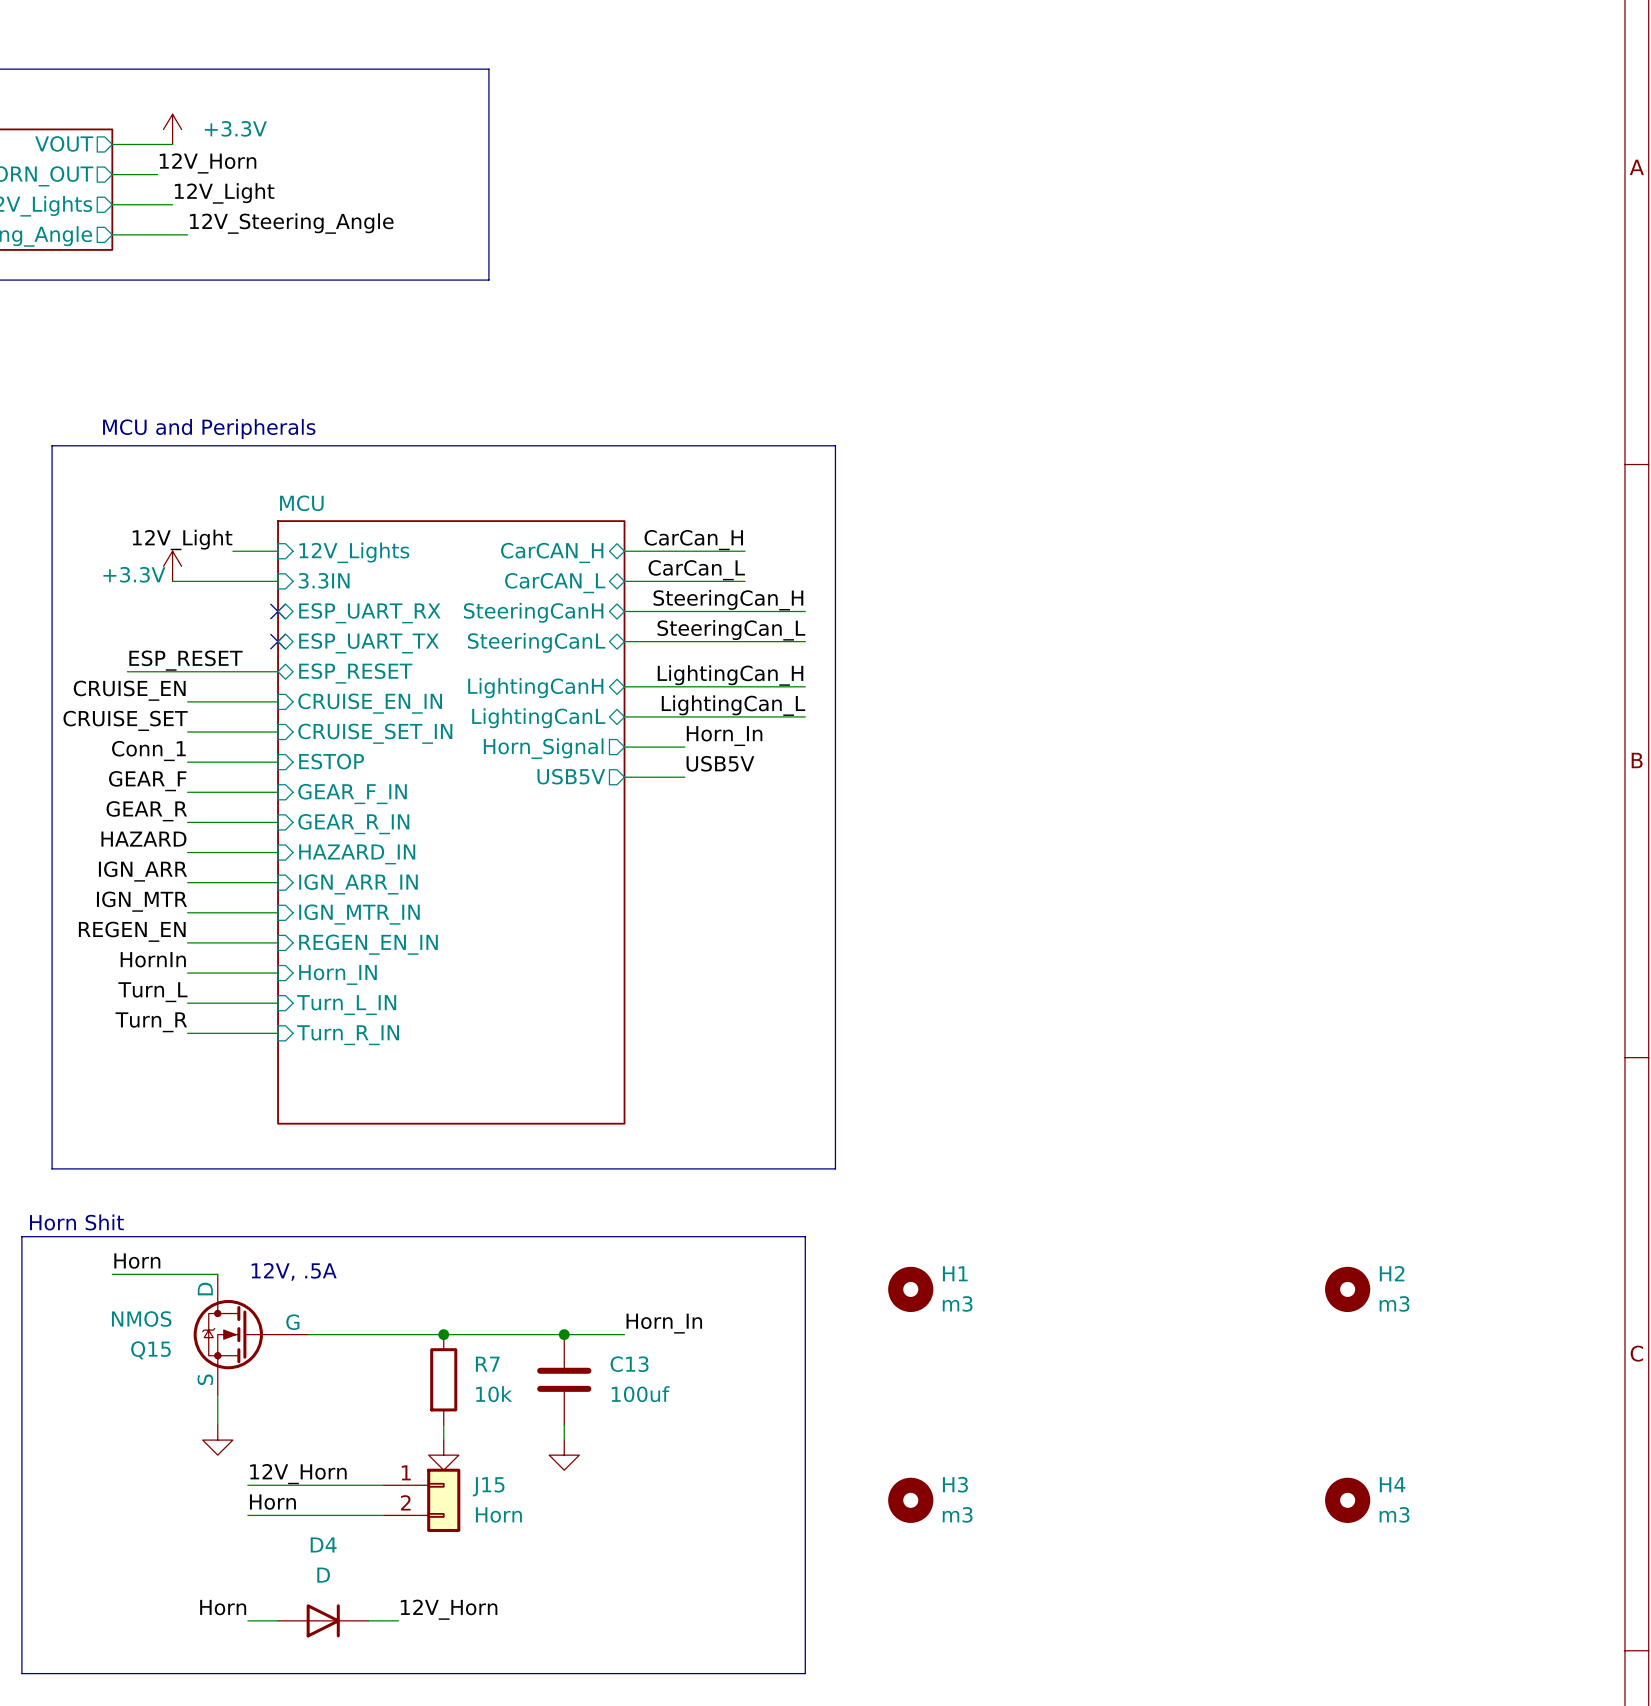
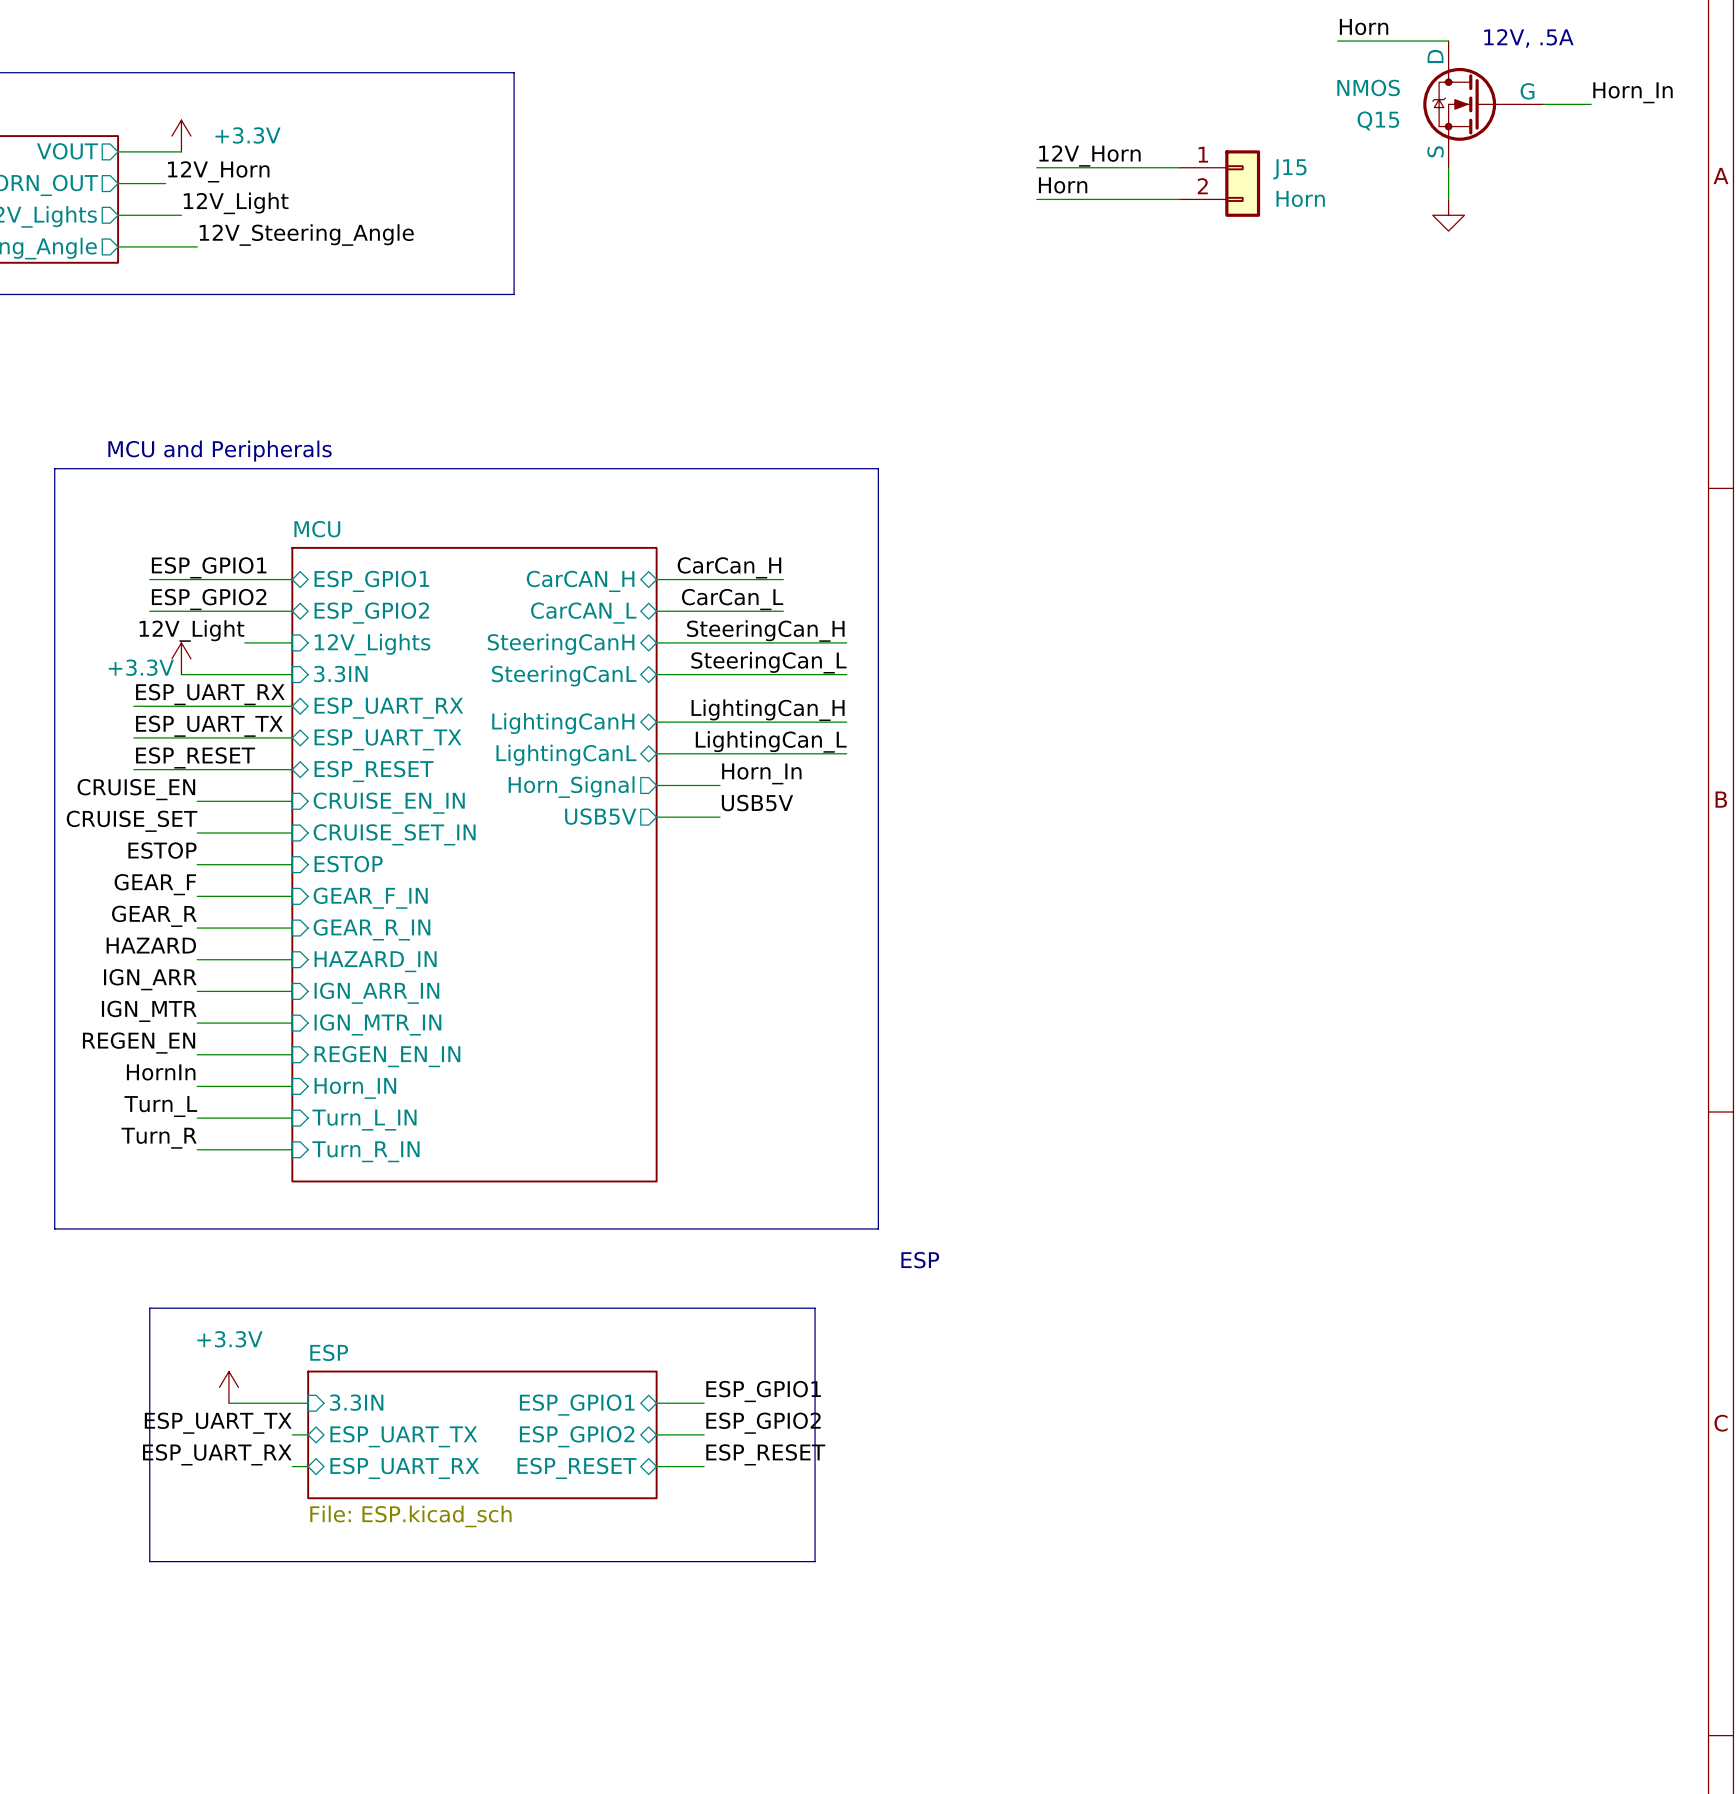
label: none -> Horn (1364, 27)
text: none -> 12V, .5A (1528, 38)
wire: none -> (1337, 41) (1448, 41)
label: none -> Horn_In (1632, 92)
wire: none -> (1543, 104) (1591, 104)
label: none -> 12V_Horn (1089, 156)
wire: none -> (1036, 167) (1179, 167)
wire: none -> (1448, 167) (1448, 199)
label: none -> Horn (1063, 185)
wire: none -> (1036, 199) (1179, 199)
power symbol: none -> (1448, 215)
label position: 12V_Light (182, 539) -> 12V_Light (191, 631)
label: none -> ESP_GPIO1 (209, 567)
wire: none -> (149, 579) (244, 579)
sheet pin shape: input (354, 552) -> bidirectional (371, 581)
sheet pin: 12V_Lights (354, 552) -> ESP_GPIO1 (371, 581)
power symbol position: +3.3V (172, 566) -> +3.3V (181, 658)
label: none -> ESP_GPIO2 (209, 599)
sheet pin shape: input (324, 580) -> bidirectional (371, 613)
sheet pin: 3.3IN (324, 580) -> ESP_GPIO2 (371, 613)
wire: none -> (149, 611) (181, 611)
wire: none -> (244, 642) (292, 642)
no-connect mark: (278, 611) -> none
sheet pin shape: bidirectional (369, 613) -> input (372, 644)
sheet pin: ESP_UART_RX (369, 613) -> 12V_Lights (372, 644)
wire: none -> (181, 674) (292, 674)
no-connect mark: (278, 641) -> none
sheet pin shape: bidirectional (369, 643) -> input (340, 674)
sheet pin: ESP_UART_TX (369, 643) -> 3.3IN (340, 674)
label: ESP_RESET (186, 660) -> ESP_UART_RX (210, 694)
sheet pin: ESP_RESET (355, 673) -> ESP_UART_RX (388, 708)
label: CRUISE_EN (129, 690) -> none
label: none -> ESP_UART_TX (209, 726)
wire: none -> (133, 737) (197, 737)
sheet pin shape: input (370, 703) -> bidirectional (387, 739)
sheet pin: CRUISE_EN_IN (370, 703) -> ESP_UART_TX (387, 739)
label: CRUISE_SET (125, 720) -> none
label: none -> ESP_RESET (195, 757)
wire: none -> (133, 769) (197, 769)
sheet pin shape: input (375, 733) -> bidirectional (374, 771)
sheet pin: CRUISE_SET_IN (375, 733) -> ESP_RESET (374, 771)
label: Conn_1 (148, 751) -> CRUISE_EN (136, 789)
sheet pin: ESTOP (331, 761) -> CRUISE_EN_IN (389, 803)
label: GEAR_F (147, 781) -> CRUISE_SET (132, 821)
sheet pin: GEAR_F_IN (352, 794) -> CRUISE_SET_IN (394, 834)
label: GEAR_R (146, 811) -> ESTOP (162, 850)
sheet pin: GEAR_R_IN (353, 824) -> ESTOP (348, 864)
label: HAZARD (143, 839) -> GEAR_F (155, 884)
sheet pin: HAZARD_IN (357, 854) -> GEAR_F_IN (370, 898)
label: IGN_ARR (142, 871) -> GEAR_R (154, 916)
sheet pin: IGN_ARR_IN (358, 884) -> GEAR_R_IN (371, 929)
label: IGN_MTR (142, 901) -> HAZARD (151, 945)
sheet pin: IGN_MTR_IN (359, 914) -> HAZARD_IN (375, 961)
label: REGEN_EN (132, 931) -> IGN_ARR (150, 979)
sheet pin: REGEN_EN_IN (368, 944) -> IGN_ARR_IN (376, 993)
label: HornIn (153, 959) -> IGN_MTR (149, 1011)
sheet pin: Horn_IN (337, 974) -> IGN_MTR_IN (377, 1024)
label: Turn_L (152, 992) -> REGEN_EN (139, 1043)
sheet pin: Turn_L_IN (346, 1005) -> REGEN_EN_IN (387, 1056)
label: Turn_R (151, 1022) -> HornIn (161, 1072)
sheet pin: Turn_R_IN (348, 1035) -> Horn_IN (355, 1088)
label: none -> Turn_L (160, 1106)
wire: none -> (197, 1118) (292, 1118)
sheet pin: none -> Turn_L_IN (364, 1120)
label: none -> Turn_R (159, 1138)
wire: none -> (197, 1149) (292, 1149)
sheet pin: none -> Turn_R_IN (365, 1151)
text: none -> ESP (920, 1260)
text: Horn Shit (76, 1222) -> none
line: (21, 1236) (805, 1236) (805, 1673) (21, 1673) (21, 1236) -> none
line: none -> (149, 1308) (815, 1308) (815, 1561) (149, 1561) (149, 1308)
label: Horn (137, 1261) -> none
text: 12V, .5A (294, 1271) -> none
wire: (112, 1274) (217, 1274) -> none
H1: m3 (910, 1289) -> none
H2: m3 (1347, 1289) -> none
power symbol: none -> +3.3V (228, 1387)
label: Horn_In (664, 1323) -> none
label: none -> ESP_GPIO1 (763, 1391)
Q15 position: (250, 1334) -> (1483, 104)
wire: (308, 1334) (624, 1334) -> (704, 1403) (656, 1403)
sheet pin: none -> 3.3IN (356, 1402)
junction: (443, 1334) -> none
junction: (564, 1334) -> none
sheet pin: none -> ESP_GPIO1 (577, 1405)
label: none -> ESP_UART_TX (218, 1423)
label: none -> ESP_GPIO2 (763, 1423)
wire: none -> (292, 1434) (308, 1434)
sheet ESP: none -> File: ESP.kicad_sch (482, 1434)
wire: none -> (656, 1434) (704, 1434)
sheet pin: none -> ESP_UART_TX (403, 1436)
sheet pin: none -> ESP_GPIO2 (577, 1436)
R7: 10k (443, 1379) -> none
C13: 100uf (564, 1379) -> none
label: none -> ESP_UART_RX (217, 1454)
label: none -> ESP_RESET (765, 1454)
wire: (217, 1394) (217, 1425) -> none
wire: none -> (292, 1466) (308, 1466)
wire: none -> (656, 1466) (704, 1466)
sheet pin: none -> ESP_UART_RX (404, 1468)
sheet pin: none -> ESP_RESET (577, 1468)
wire: (443, 1425) (443, 1440) -> none
wire: (564, 1425) (564, 1440) -> none
power symbol: (217, 1440) -> none
power symbol: (443, 1455) -> none
power symbol: (564, 1455) -> none
label: 12V_Horn (298, 1474) -> none
J15 position: (421, 1500) -> (1219, 183)
H3: m3 (910, 1500) -> none
H4: m3 (1347, 1500) -> none
label: Horn (272, 1502) -> none
wire: (247, 1515) (383, 1515) -> none
label: Horn (223, 1607) -> none
label: 12V_Horn (449, 1609) -> none
wire: (247, 1620) (278, 1620) -> none
D4: D (323, 1620) -> none
wire: (368, 1620) (398, 1620) -> none

